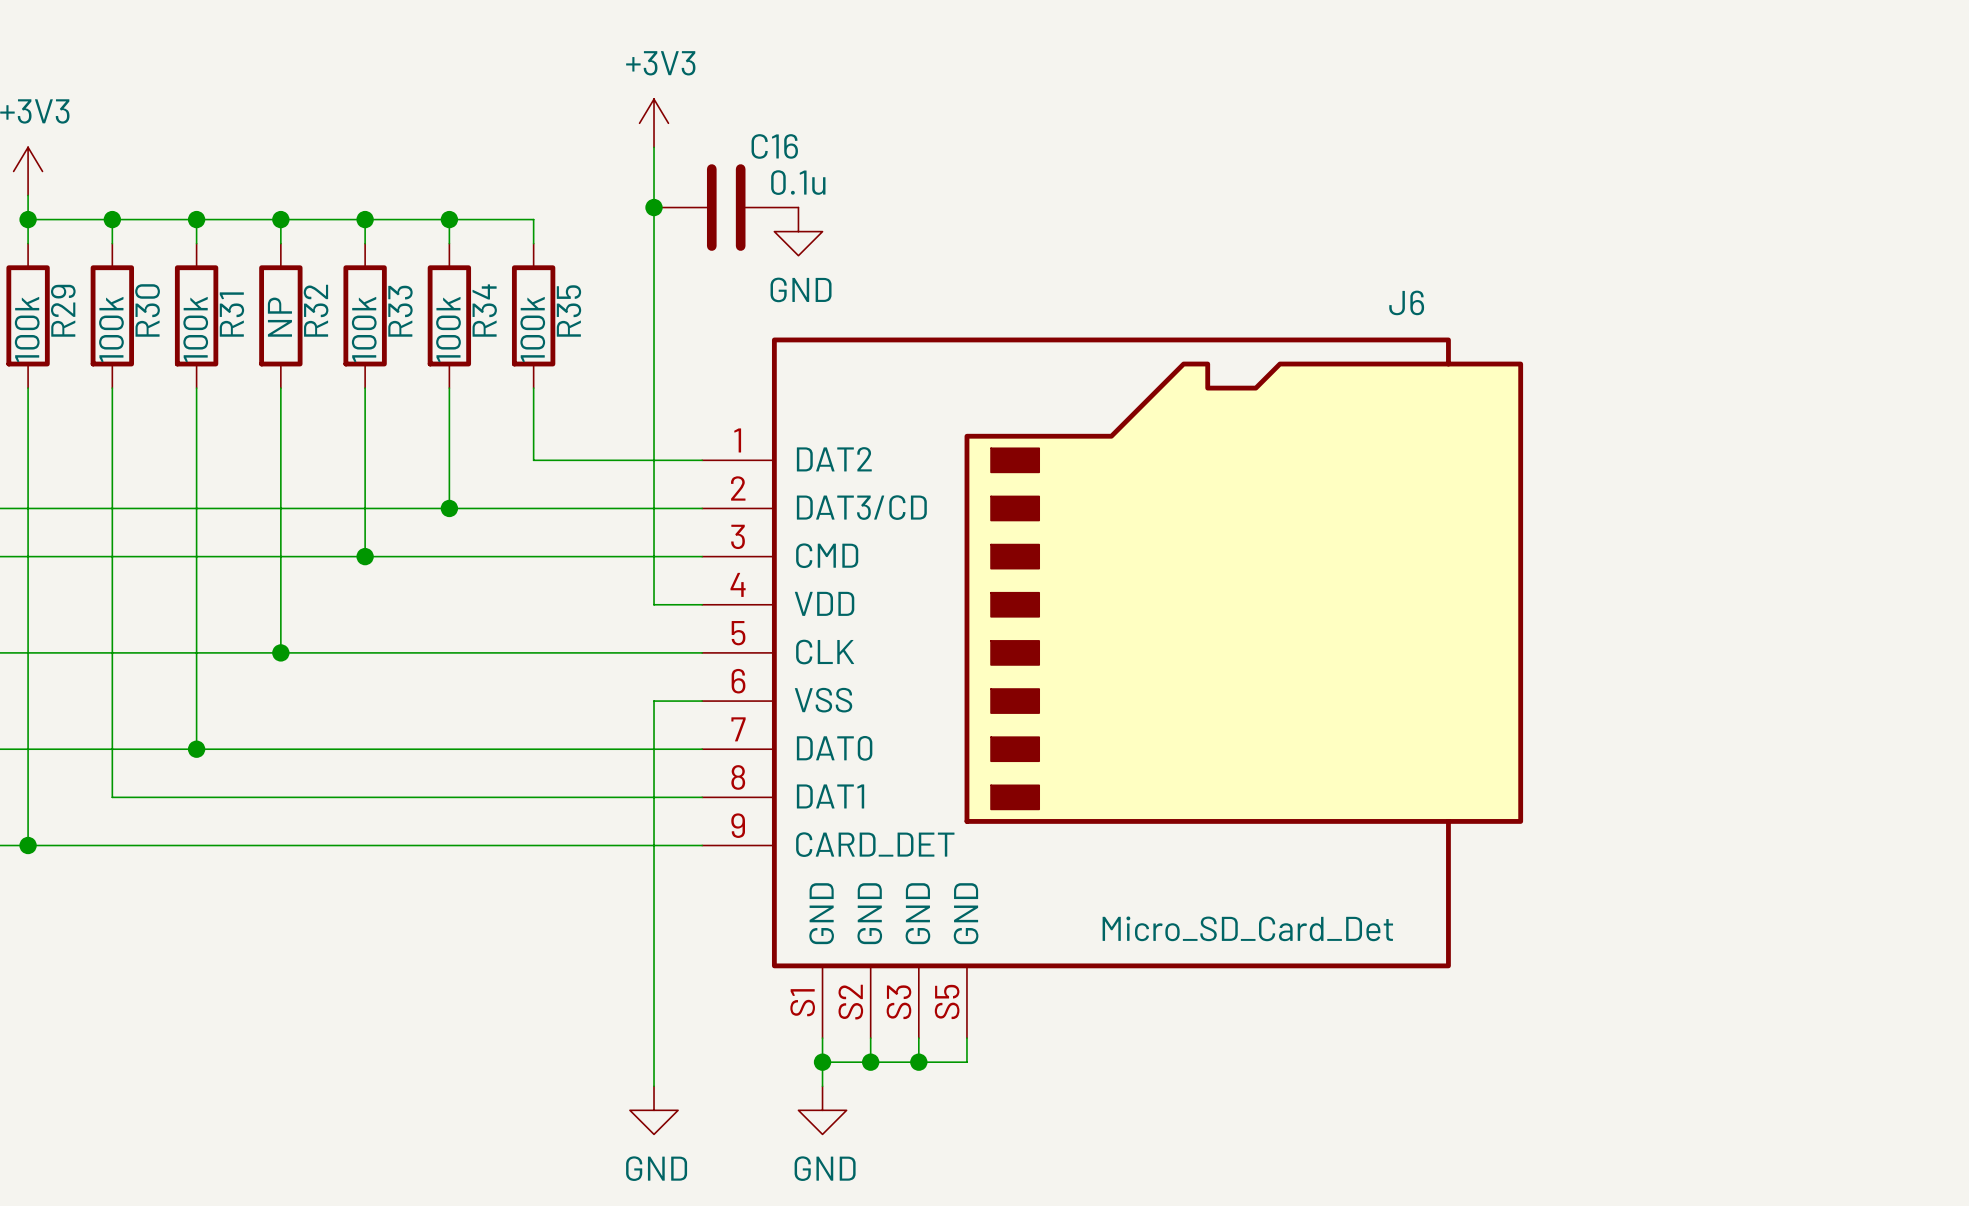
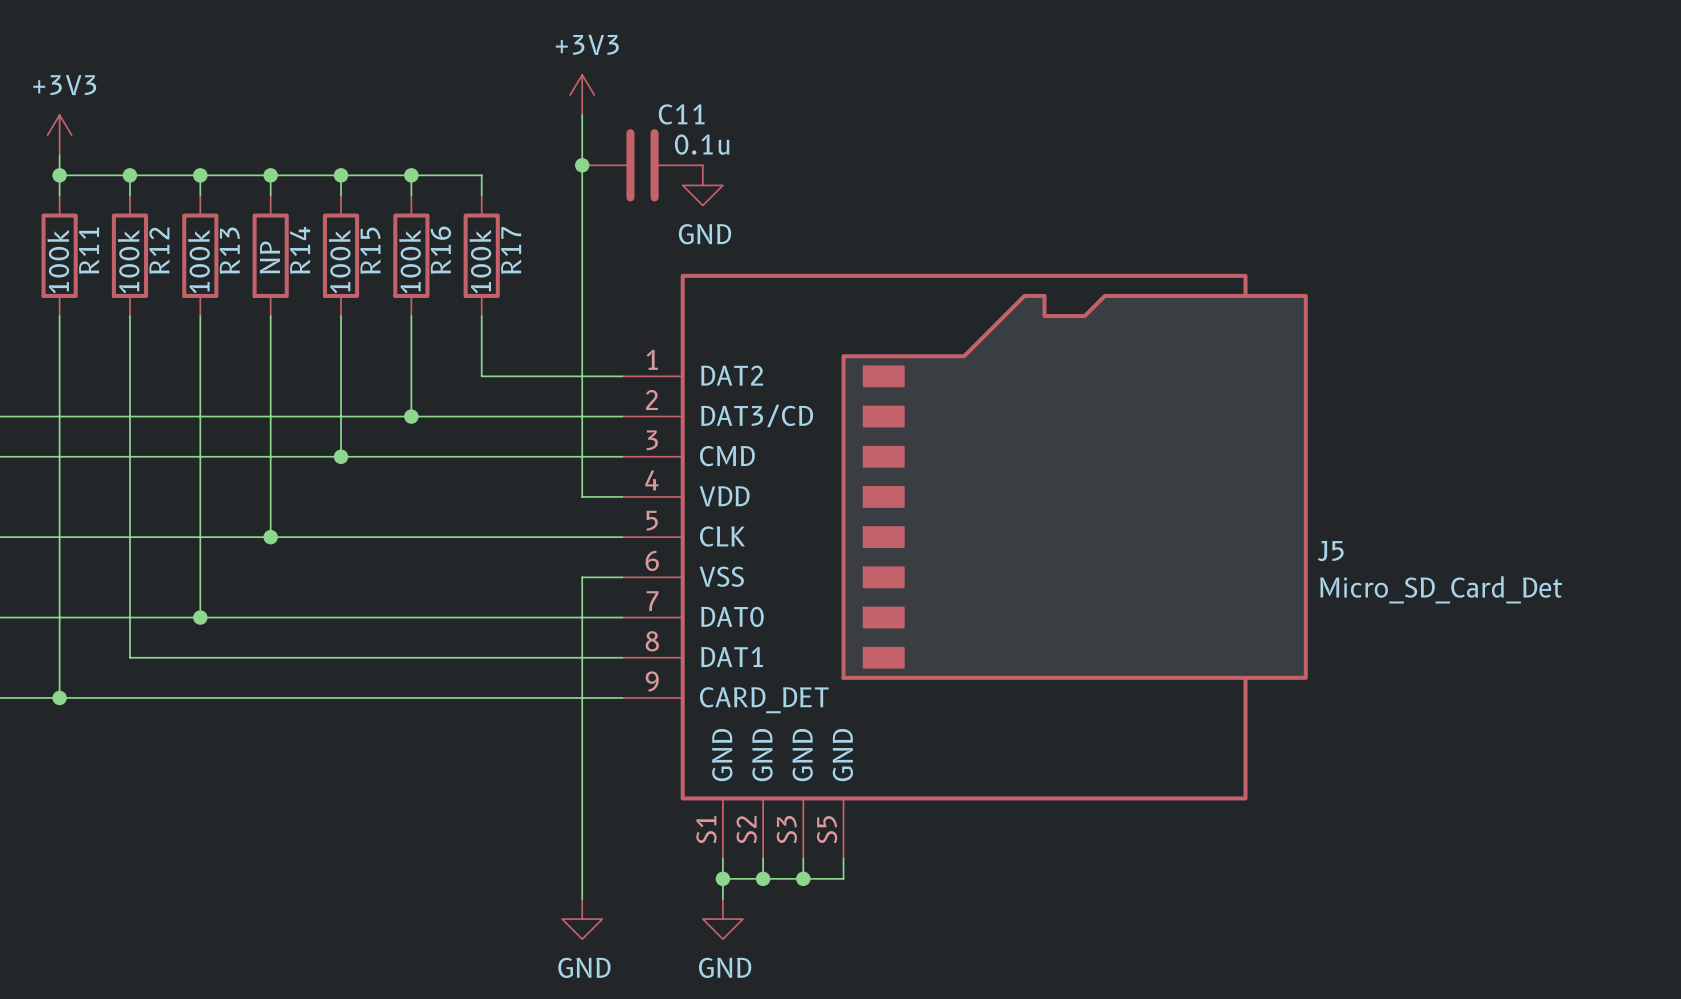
C16 name: C16 (774, 146) -> C11 (681, 114)
J6 name: J6 (1406, 302) -> J5 (1330, 550)
R29 name: R29 (63, 310) -> R11 (89, 250)
R30 name: R30 (147, 310) -> R12 (159, 250)
R32 name: R32 (316, 310) -> R14 (300, 250)
R34 name: R34 (484, 310) -> R16 (440, 250)
R35 name: R35 (568, 310) -> R17 (511, 250)
R33 name: R33 (400, 311) -> R15 (370, 250)
R31 name: R31 (231, 314) -> R13 (229, 250)
J6 value position: Micro_SD_Card_Det (1247, 928) -> Micro_SD_Card_Det (1441, 589)

